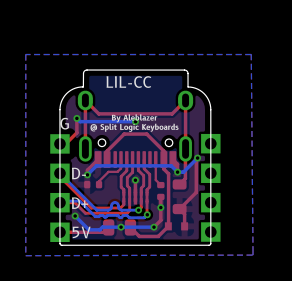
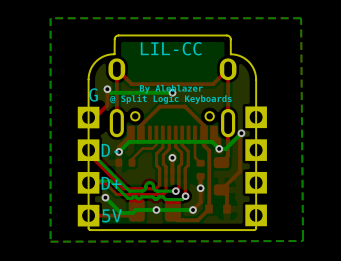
part footprint: [103, 219, 137, 236] -> [128, 199, 181, 222]

